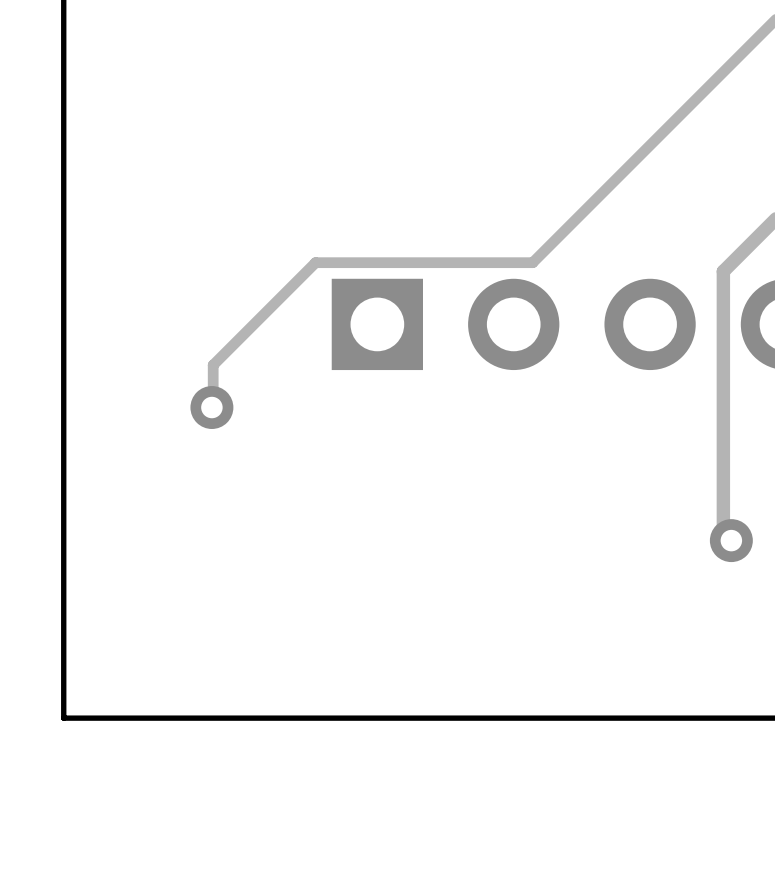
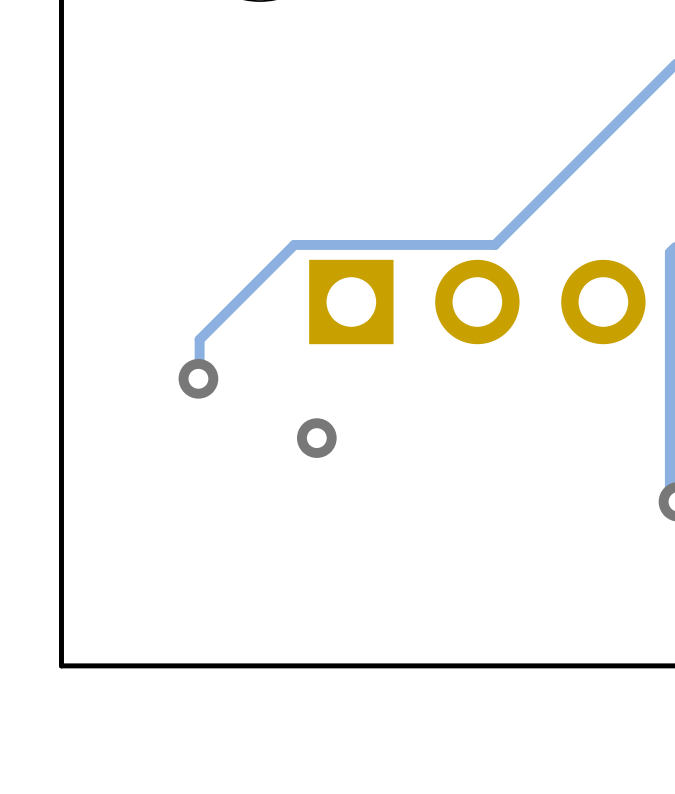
via: none -> (316, 438)

